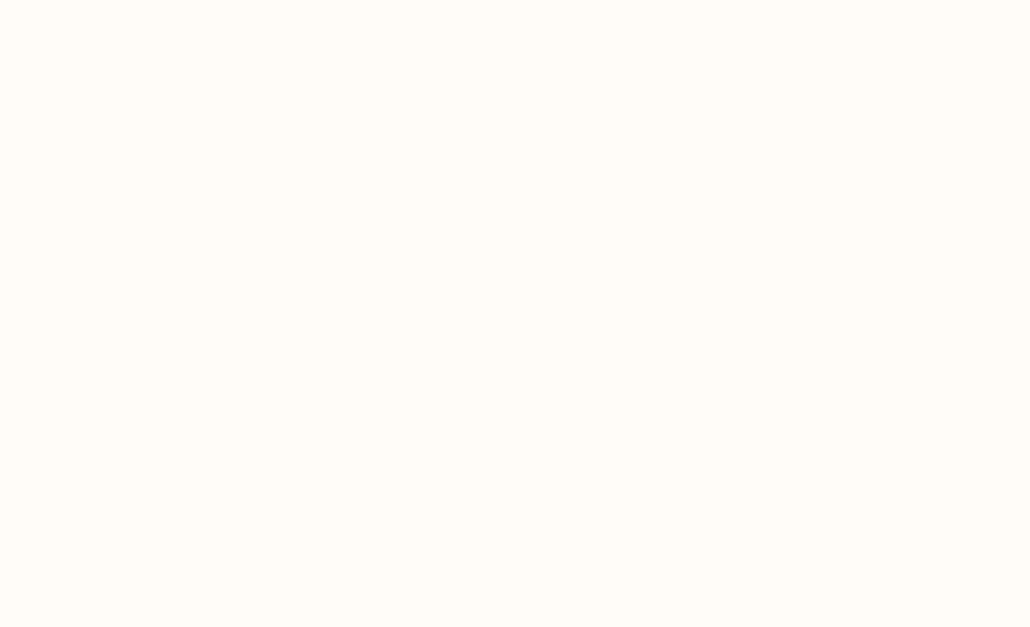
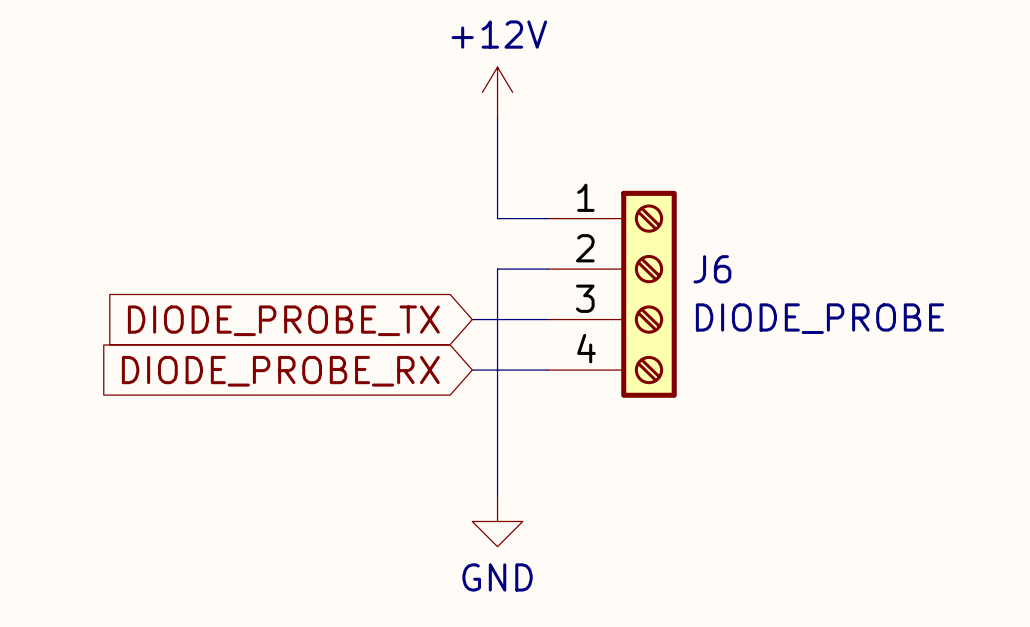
power symbol: none -> +12V (497, 92)
wire: none -> (497, 117) (497, 218) (548, 218)
wire: none -> (548, 269) (497, 269) (497, 496)
J6: none -> DIODE_PROBE (612, 294)
wire: none -> (472, 319) (548, 319)
global label: none -> DIODE_PROBE_TX (283, 320)
wire: none -> (472, 370) (548, 370)
global label: none -> DIODE_PROBE_RX (280, 371)
power symbol: none -> GND (497, 521)

